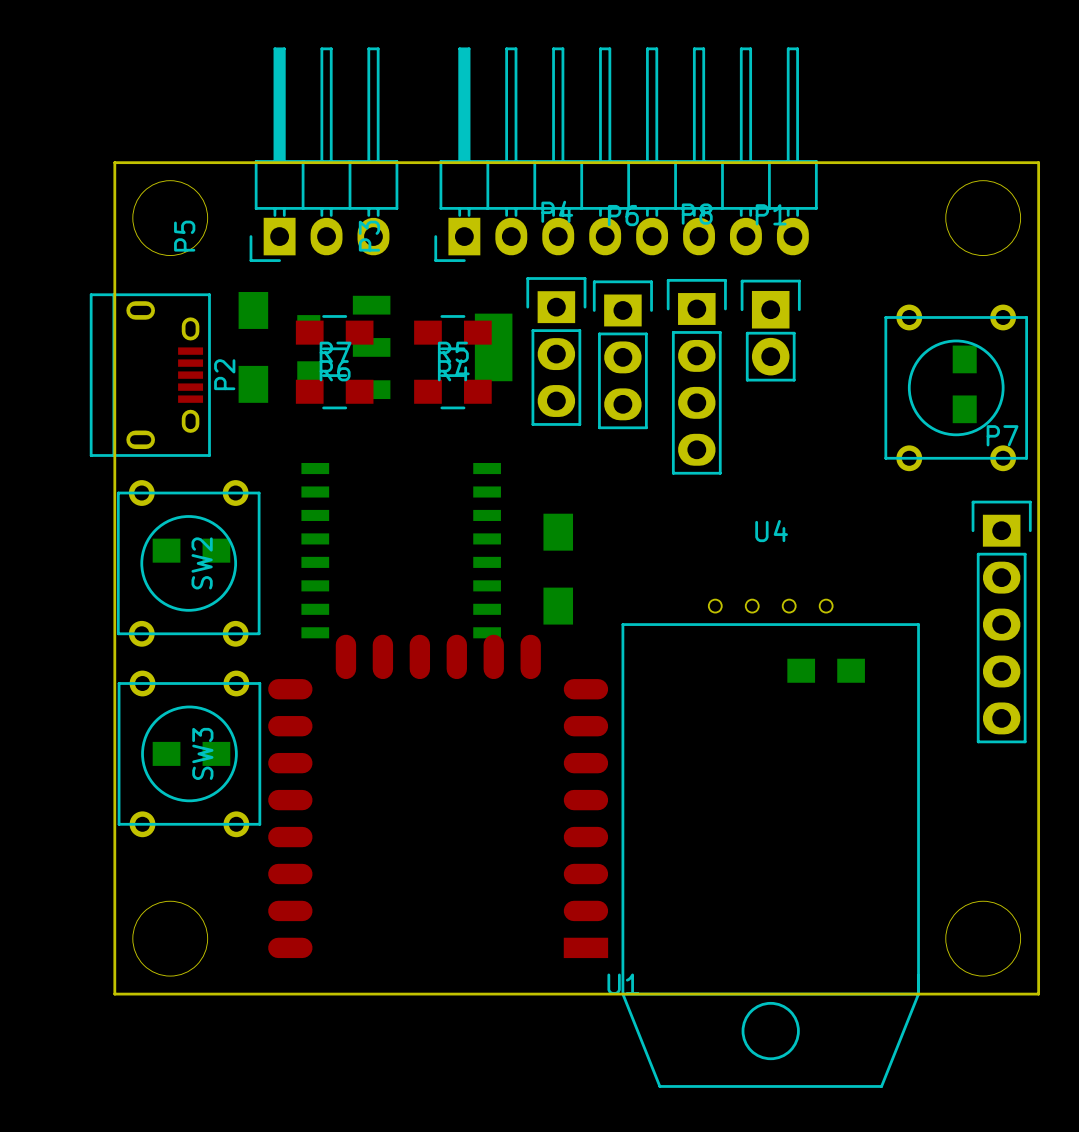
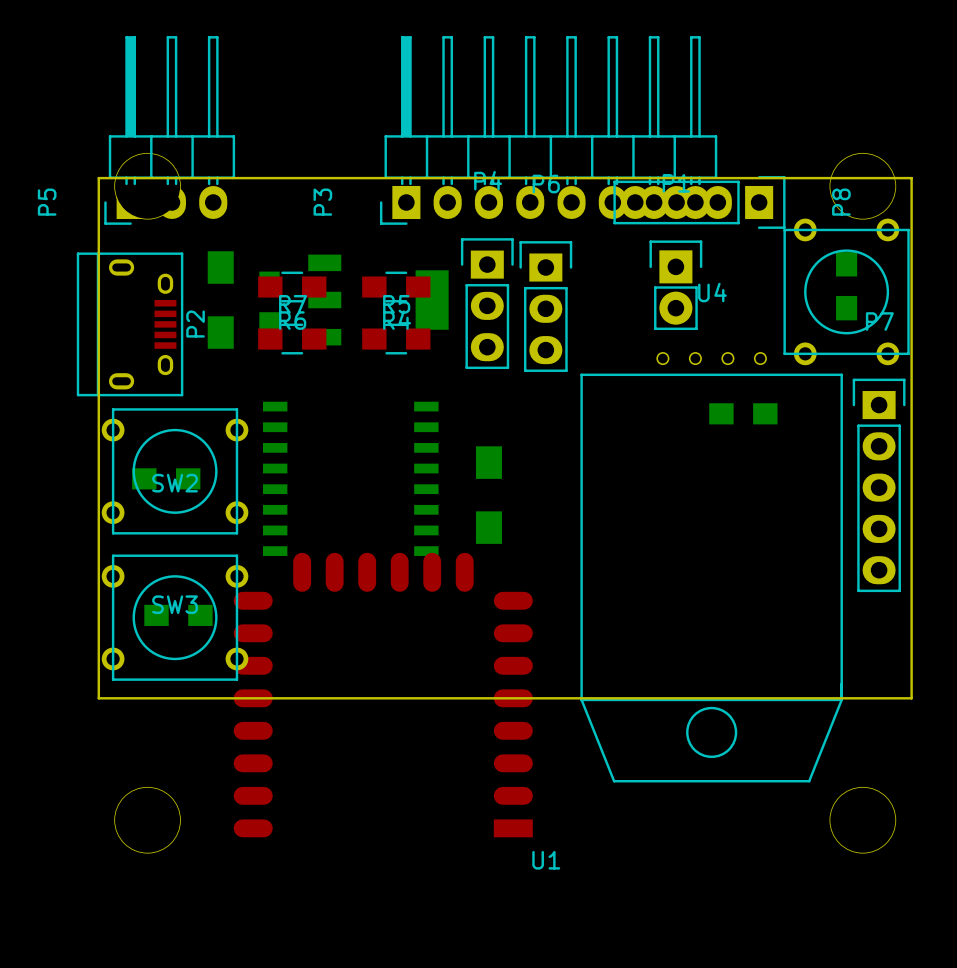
P5 position: (323, 154) -> (169, 130)
board edge: (114, 208) (114, 162) (1038, 162) (1038, 208) -> (98, 178) (911, 178)
P8 rotation: 0° (696, 376) -> 90° clockwise (699, 202)
P8 position: (696, 376) -> (699, 202)
part position: (964, 384) -> (846, 286)
part position: (956, 387) -> (846, 291)
part: none -> (743, 413)
SW2 rotation: 0° (188, 563) -> 90° clockwise (175, 471)
P7 position: (1001, 621) -> (879, 485)
part: (826, 670) -> none
SW3 rotation: 0° (189, 753) -> 90° clockwise (175, 617)
part position: (191, 753) -> (178, 615)
board edge: (114, 800) (114, 994) (1038, 994) (1038, 800) -> (98, 698) (911, 698)
U4 position: (770, 843) -> (711, 567)

